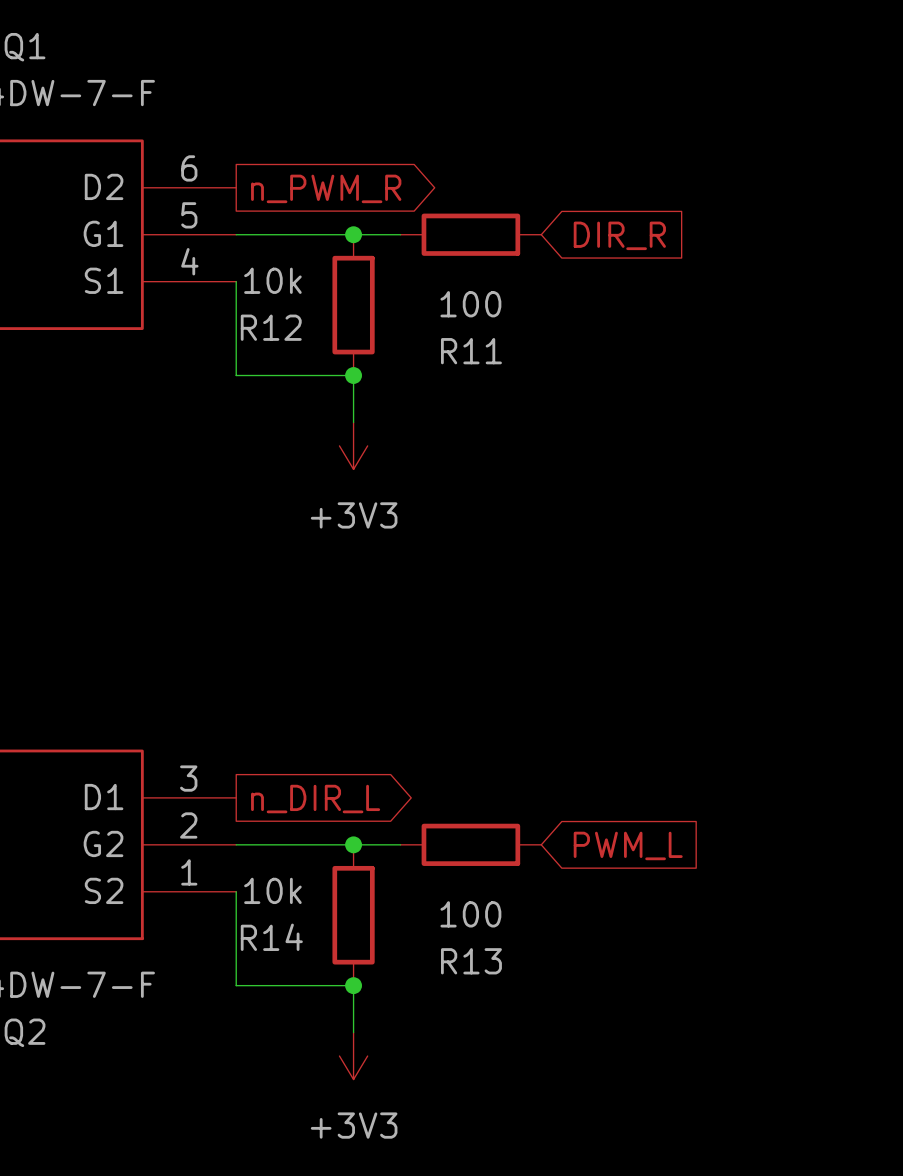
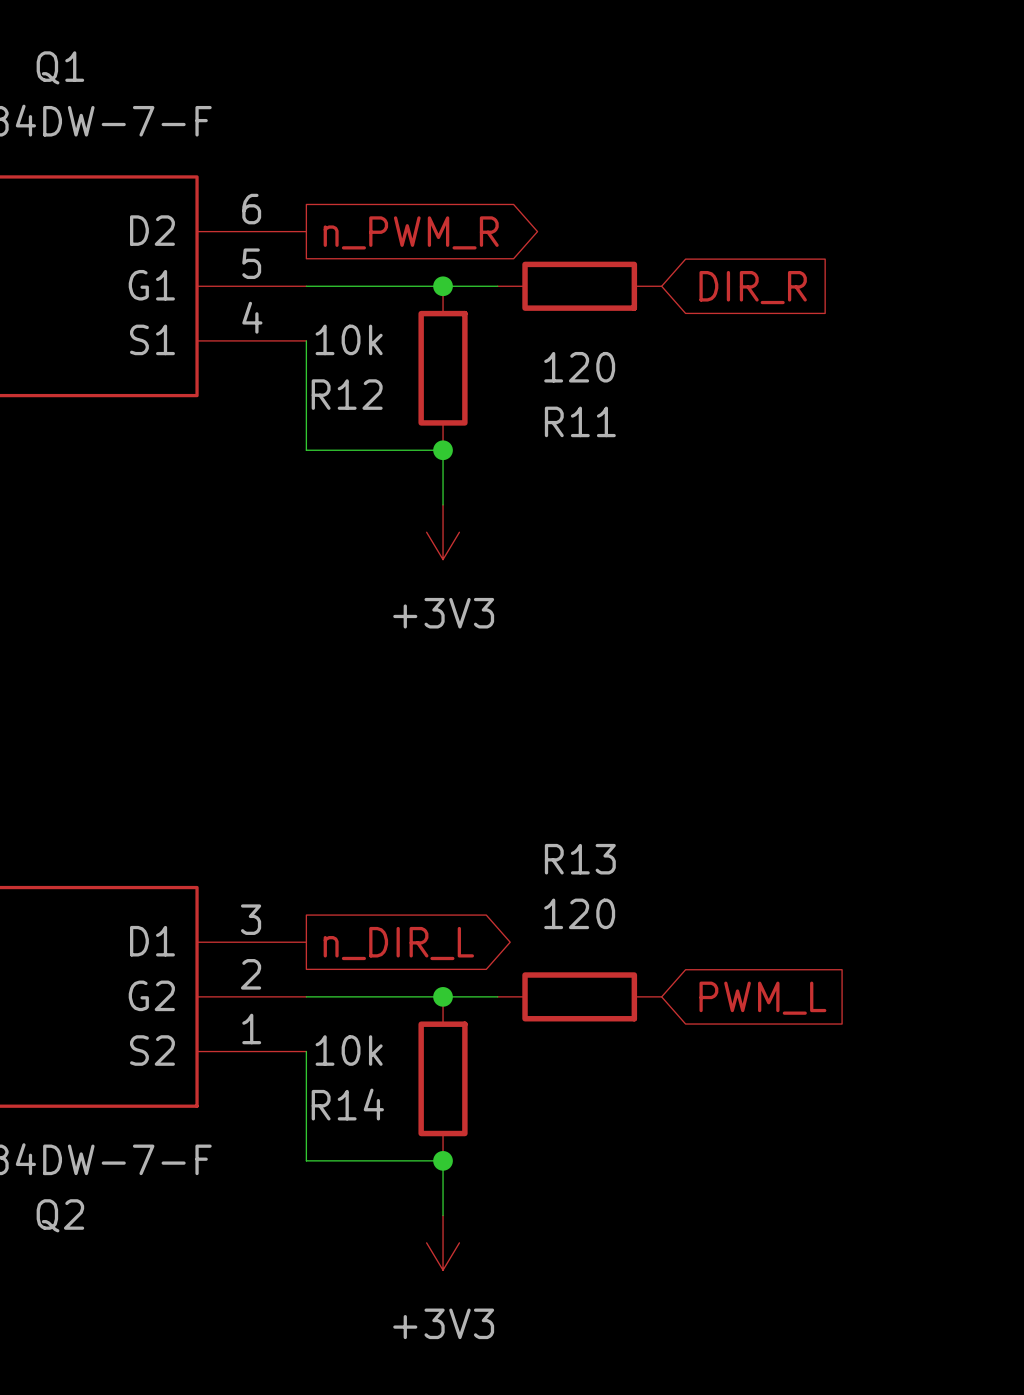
R11 value: 100 (470, 304) -> 120 (579, 367)
R13 value: 100 (470, 914) -> 120 (579, 913)
R13 name position: R13 (471, 961) -> R13 (580, 859)

